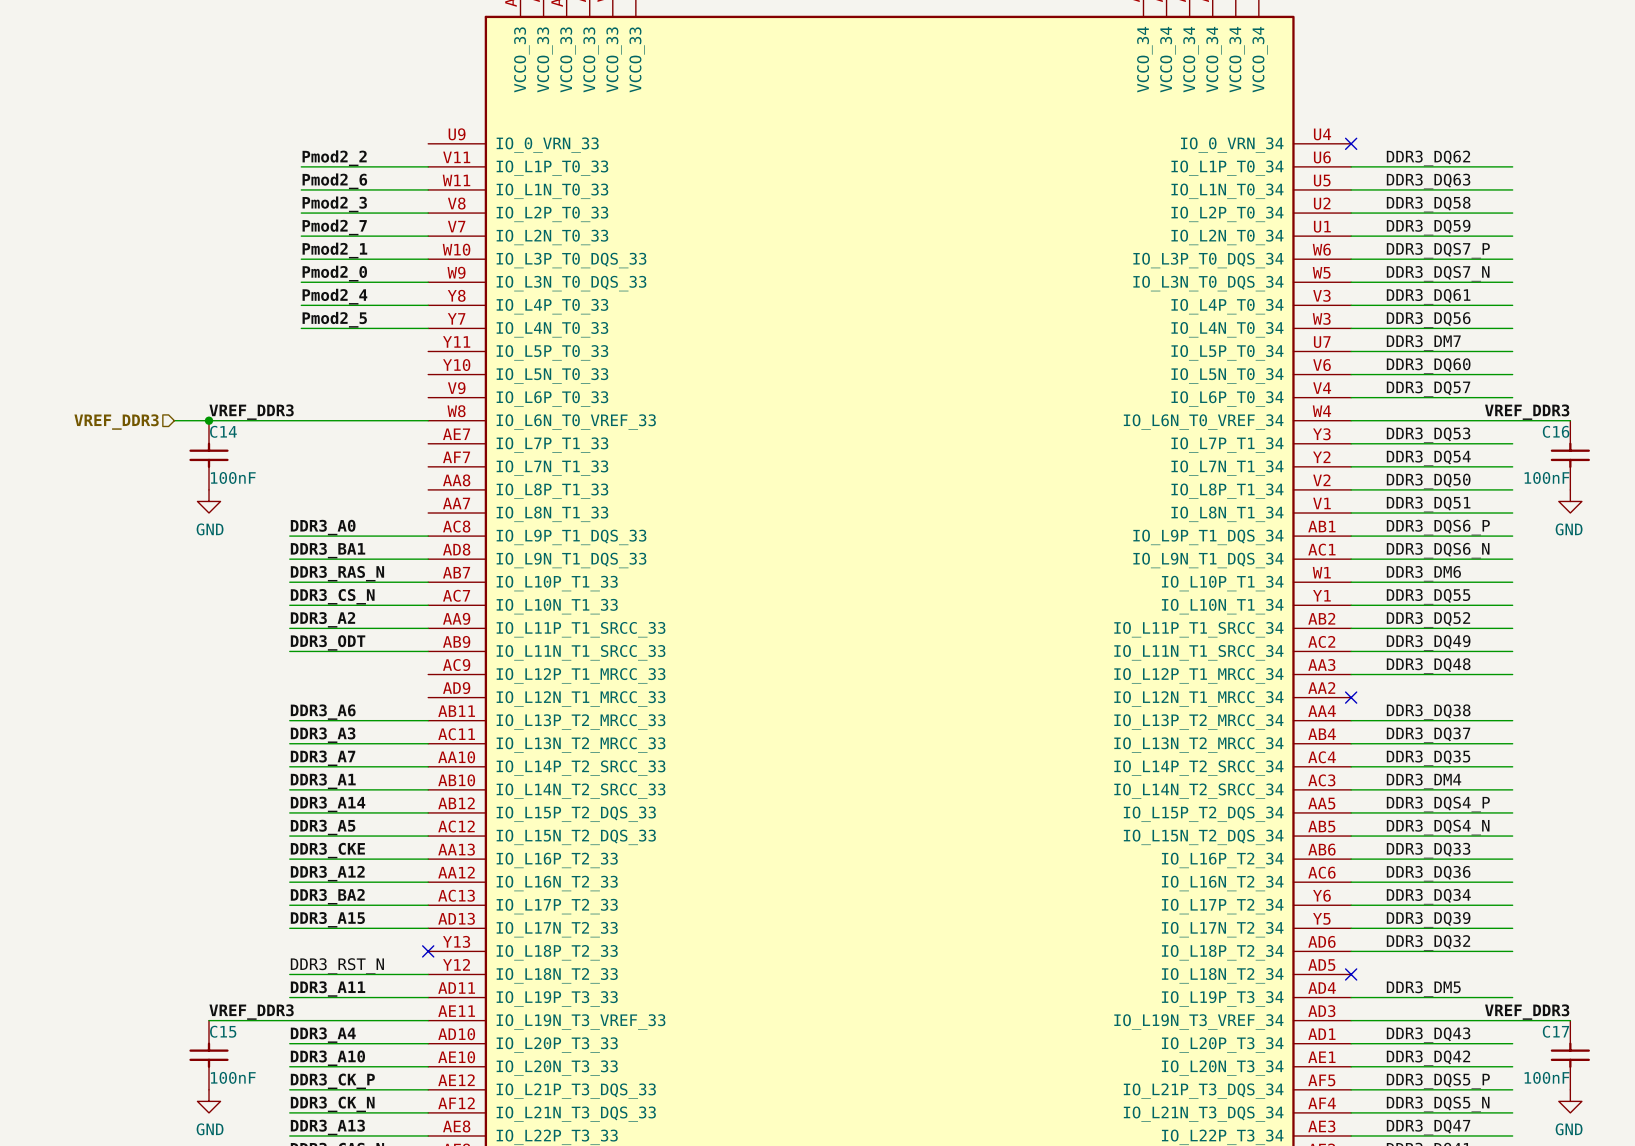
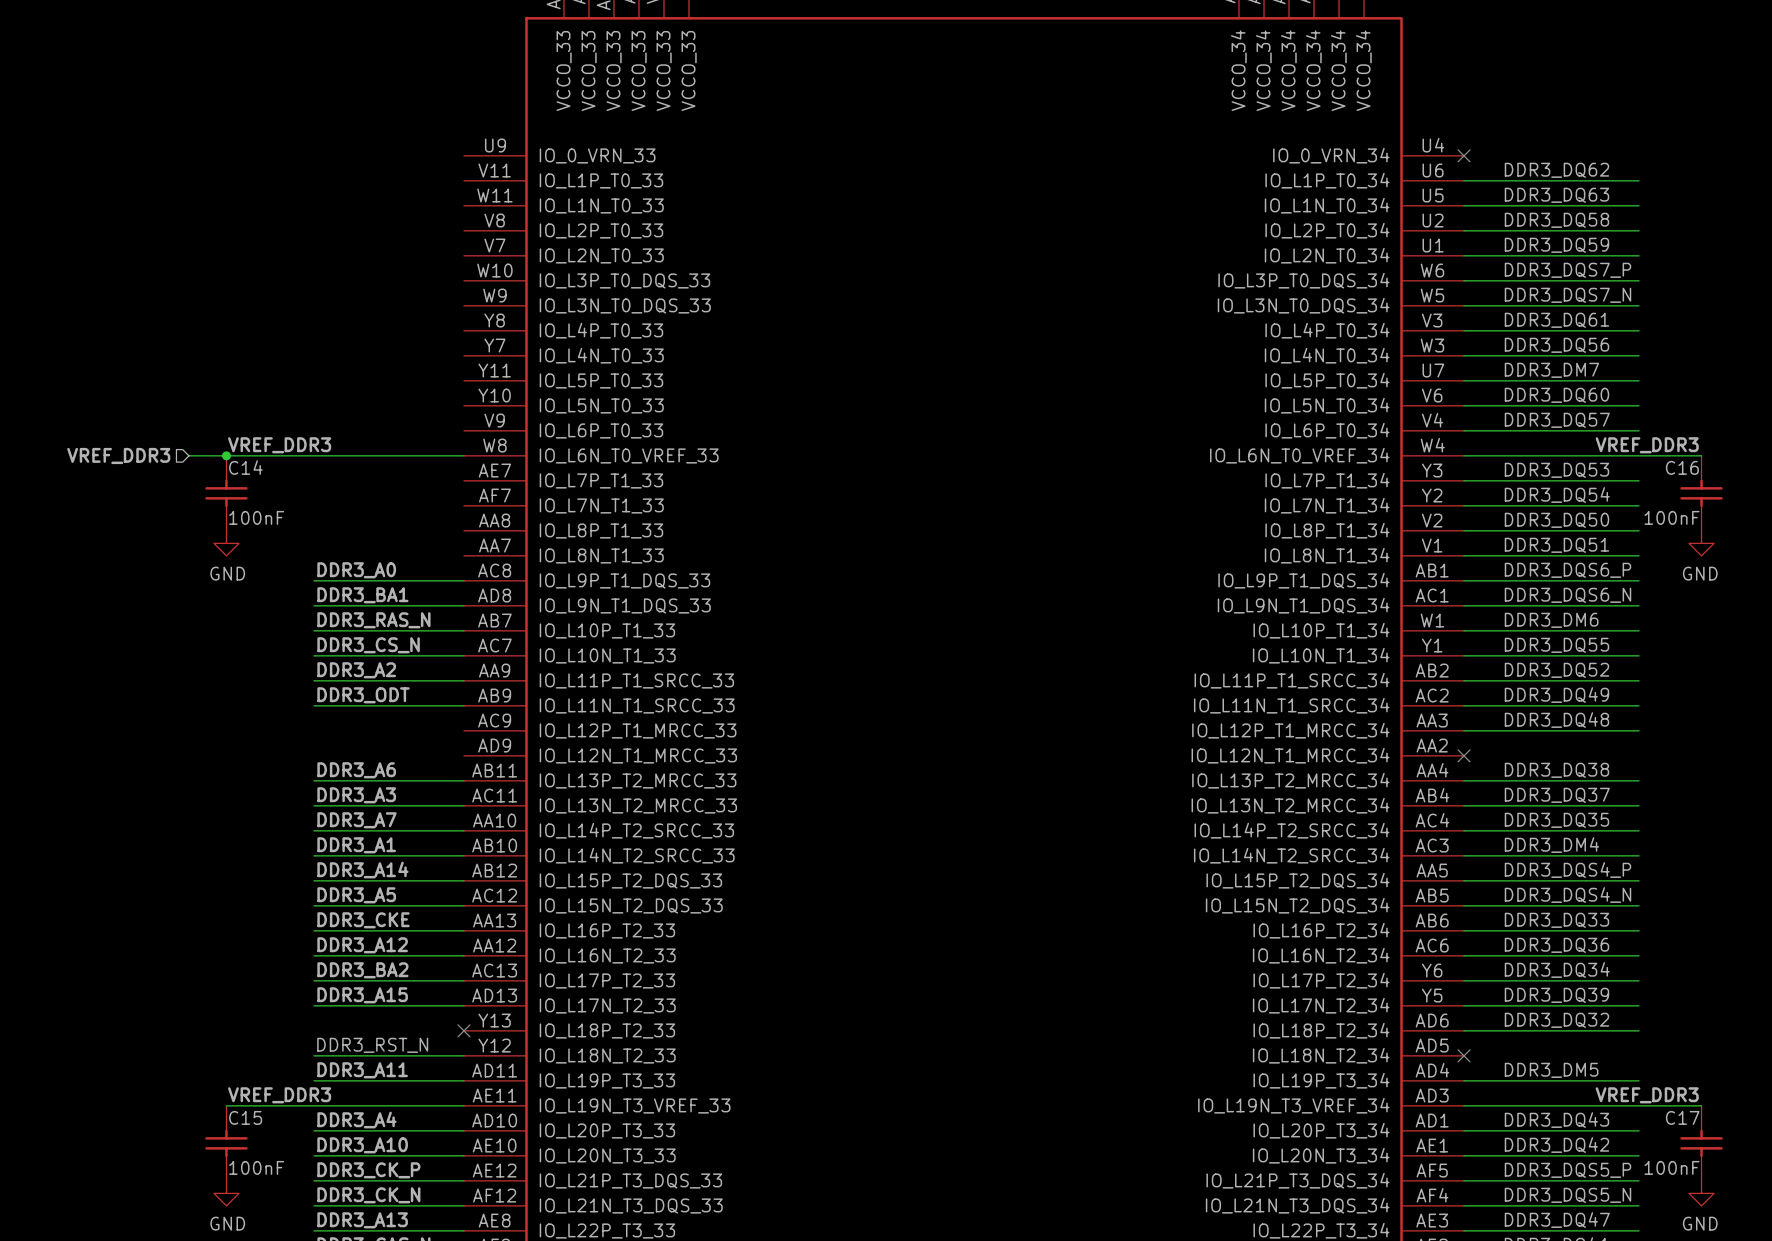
label: Pmod2_2 (334, 158) -> none
wire: (301, 166) (428, 166) -> none
label: Pmod2_6 (334, 181) -> none
wire: (301, 189) (428, 189) -> none
label: Pmod2_3 (334, 204) -> none
wire: (301, 213) (428, 213) -> none
label: Pmod2_7 (334, 227) -> none
wire: (301, 236) (428, 236) -> none
label: Pmod2_1 (334, 250) -> none
wire: (301, 259) (428, 259) -> none
label: Pmod2_0 (334, 273) -> none
wire: (301, 282) (428, 282) -> none
label: Pmod2_4 (334, 296) -> none
wire: (301, 305) (428, 305) -> none
label: Pmod2_5 (334, 319) -> none
wire: (301, 328) (428, 328) -> none

